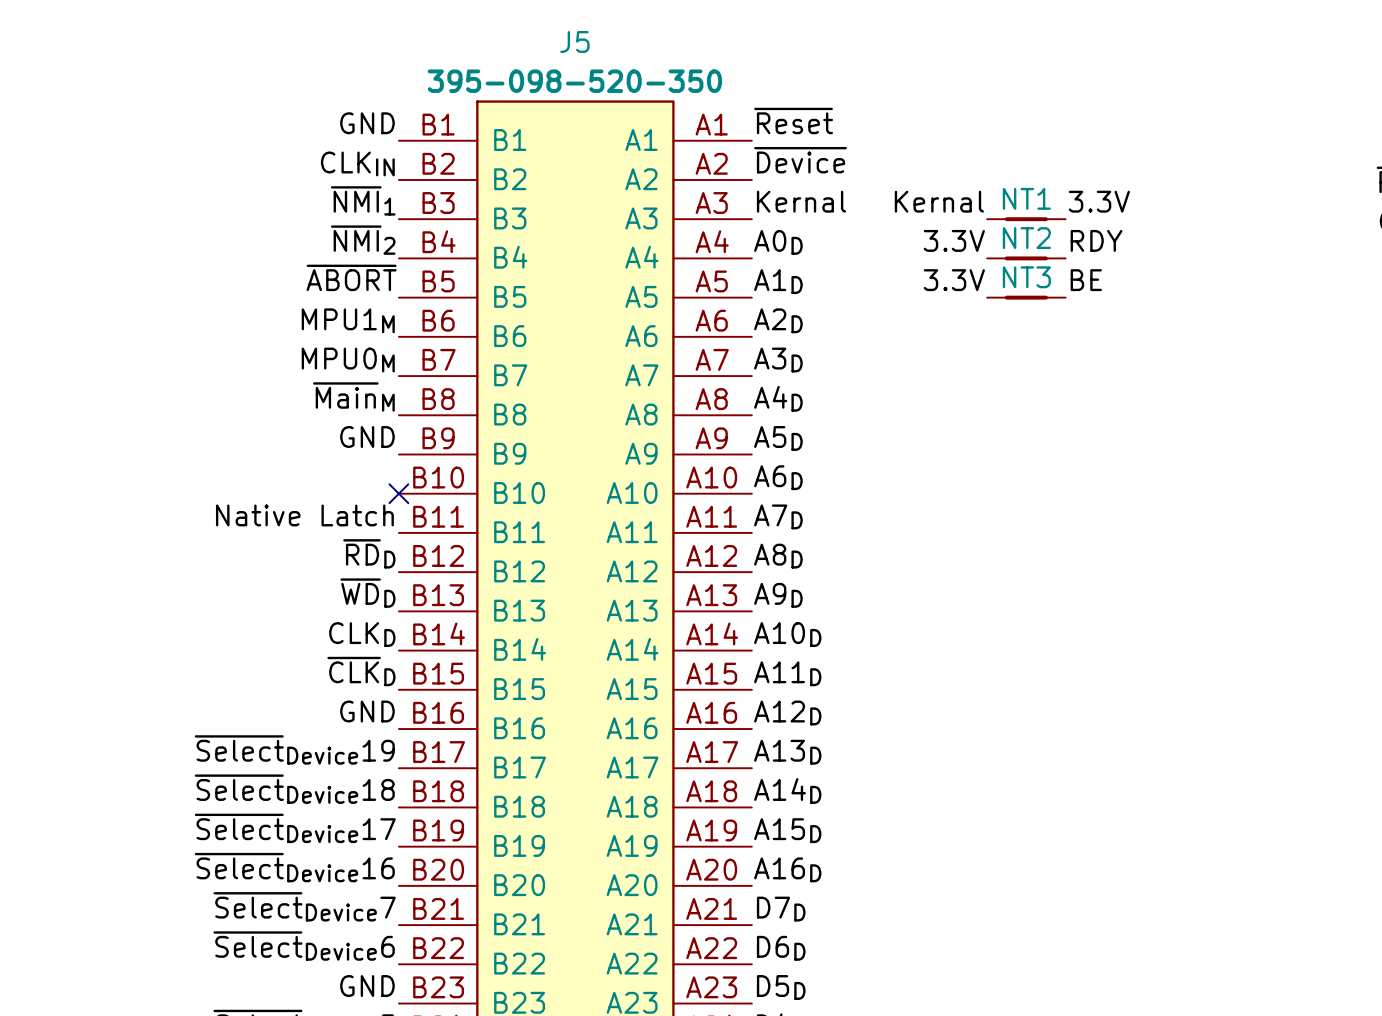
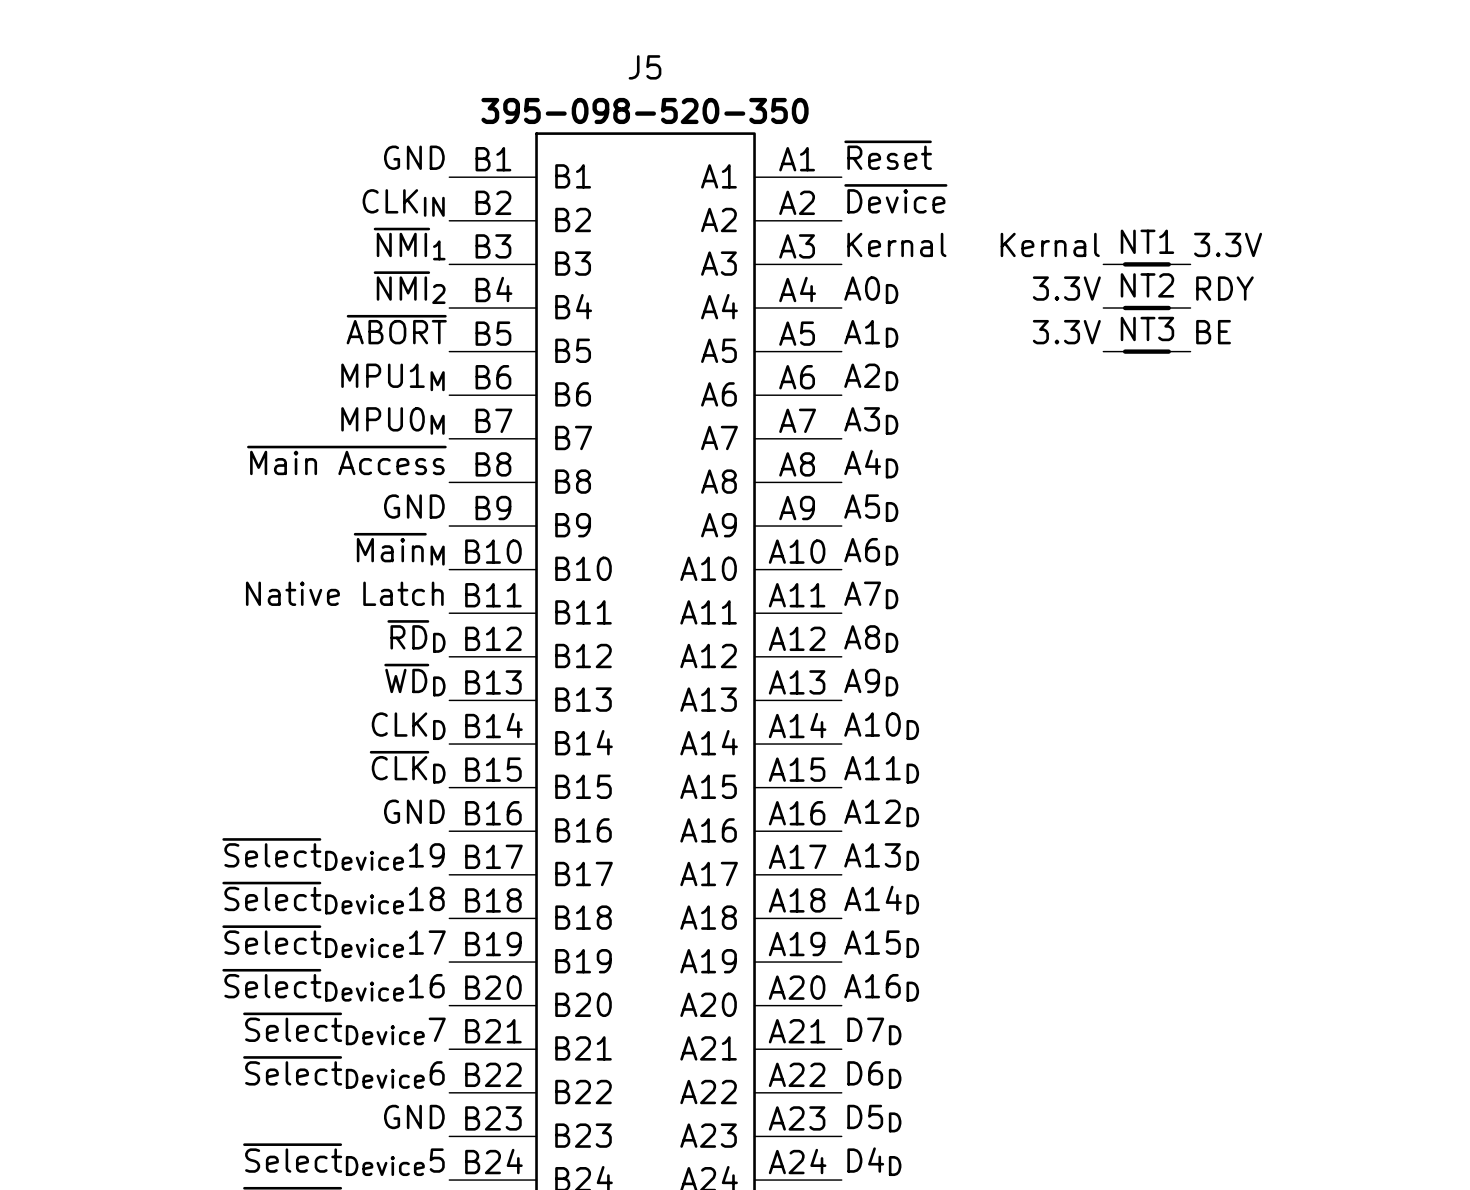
label: ~{Main}M (353, 396) -> ~{Main Access} (346, 460)
label: none -> ~{Main}M (399, 549)
no-connect mark: (398, 493) -> none

